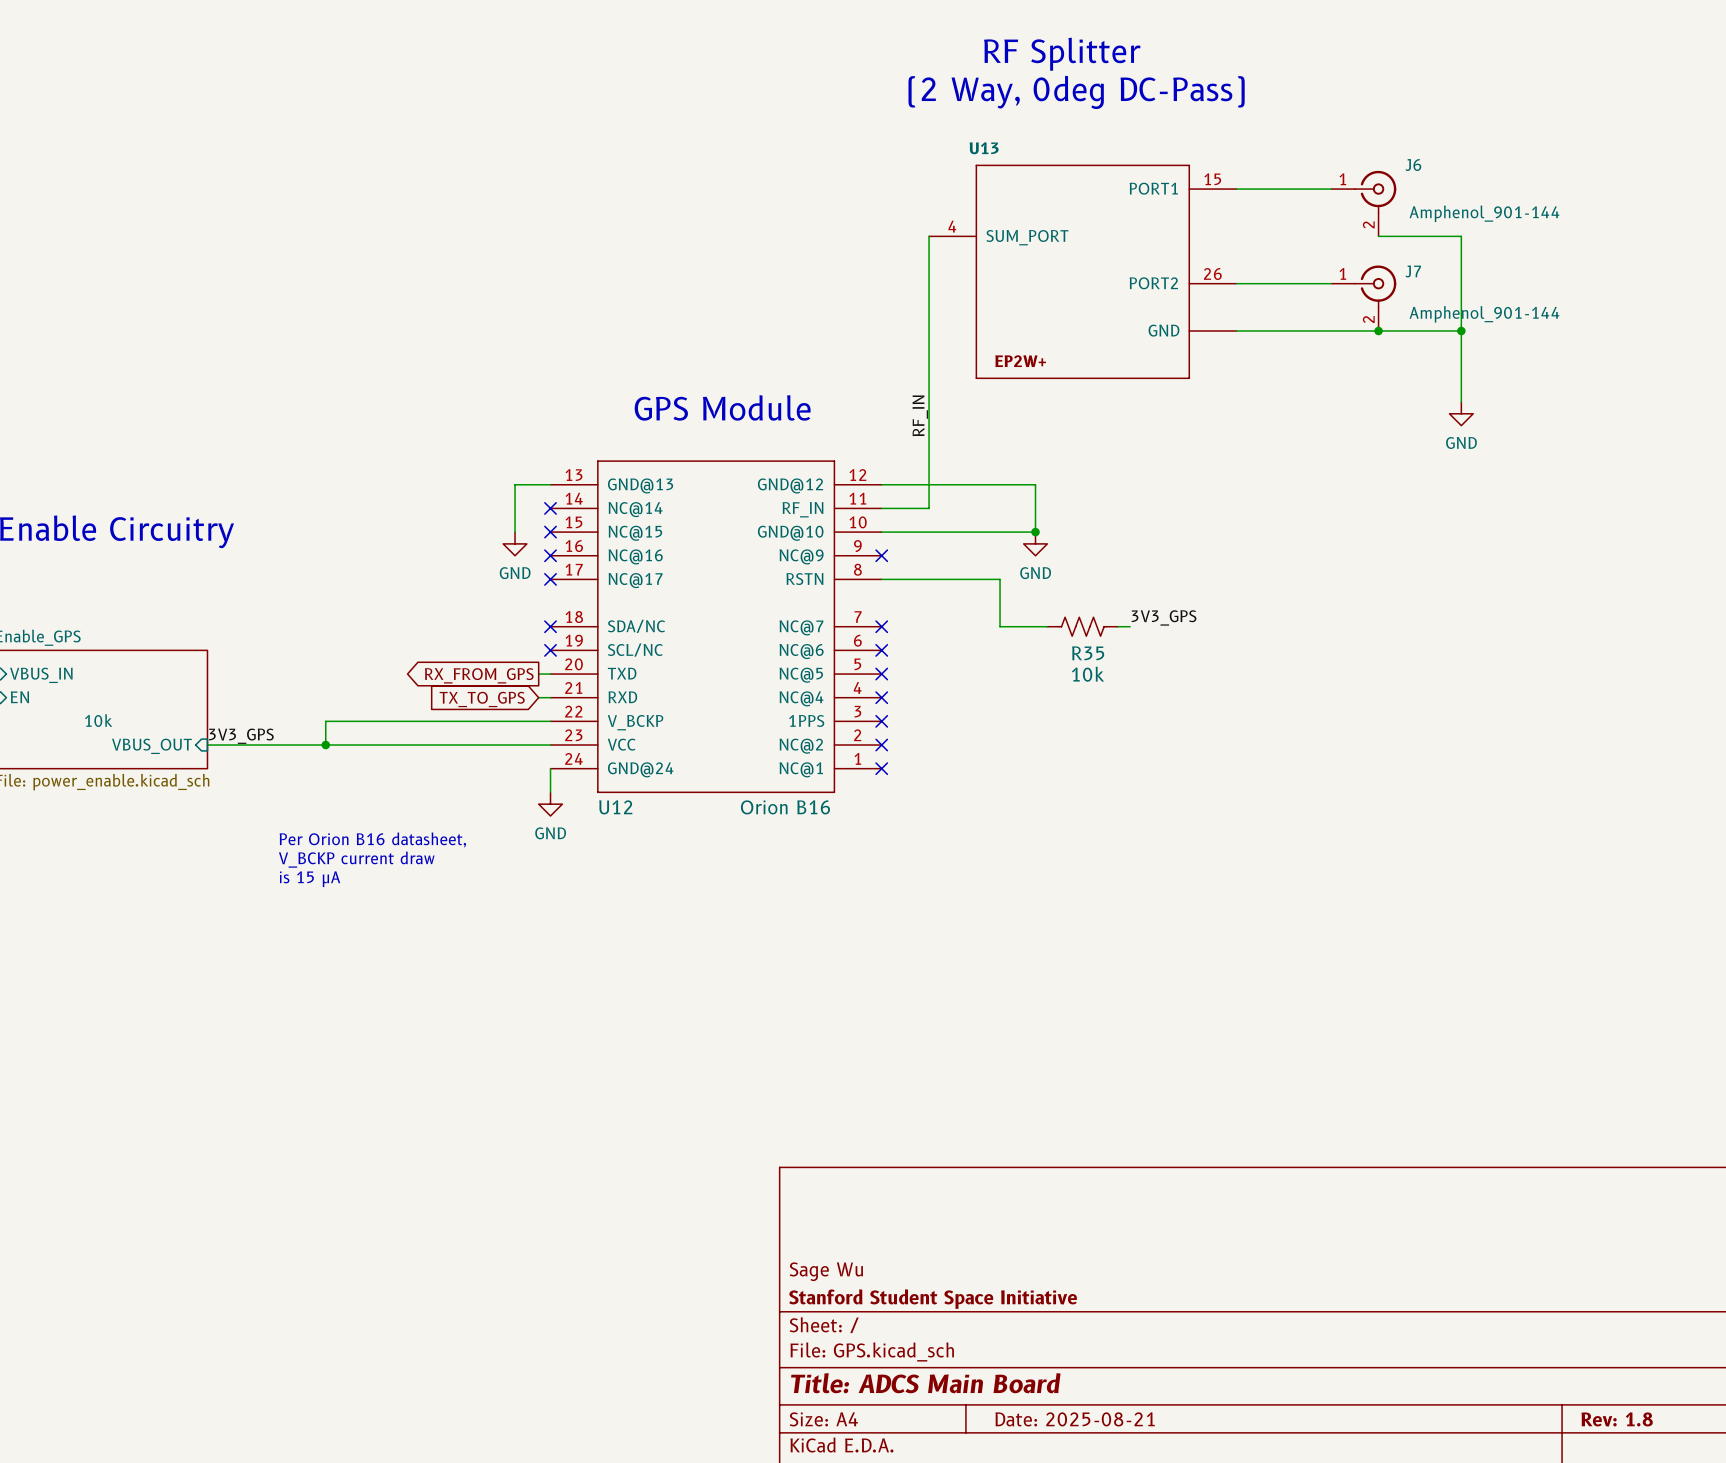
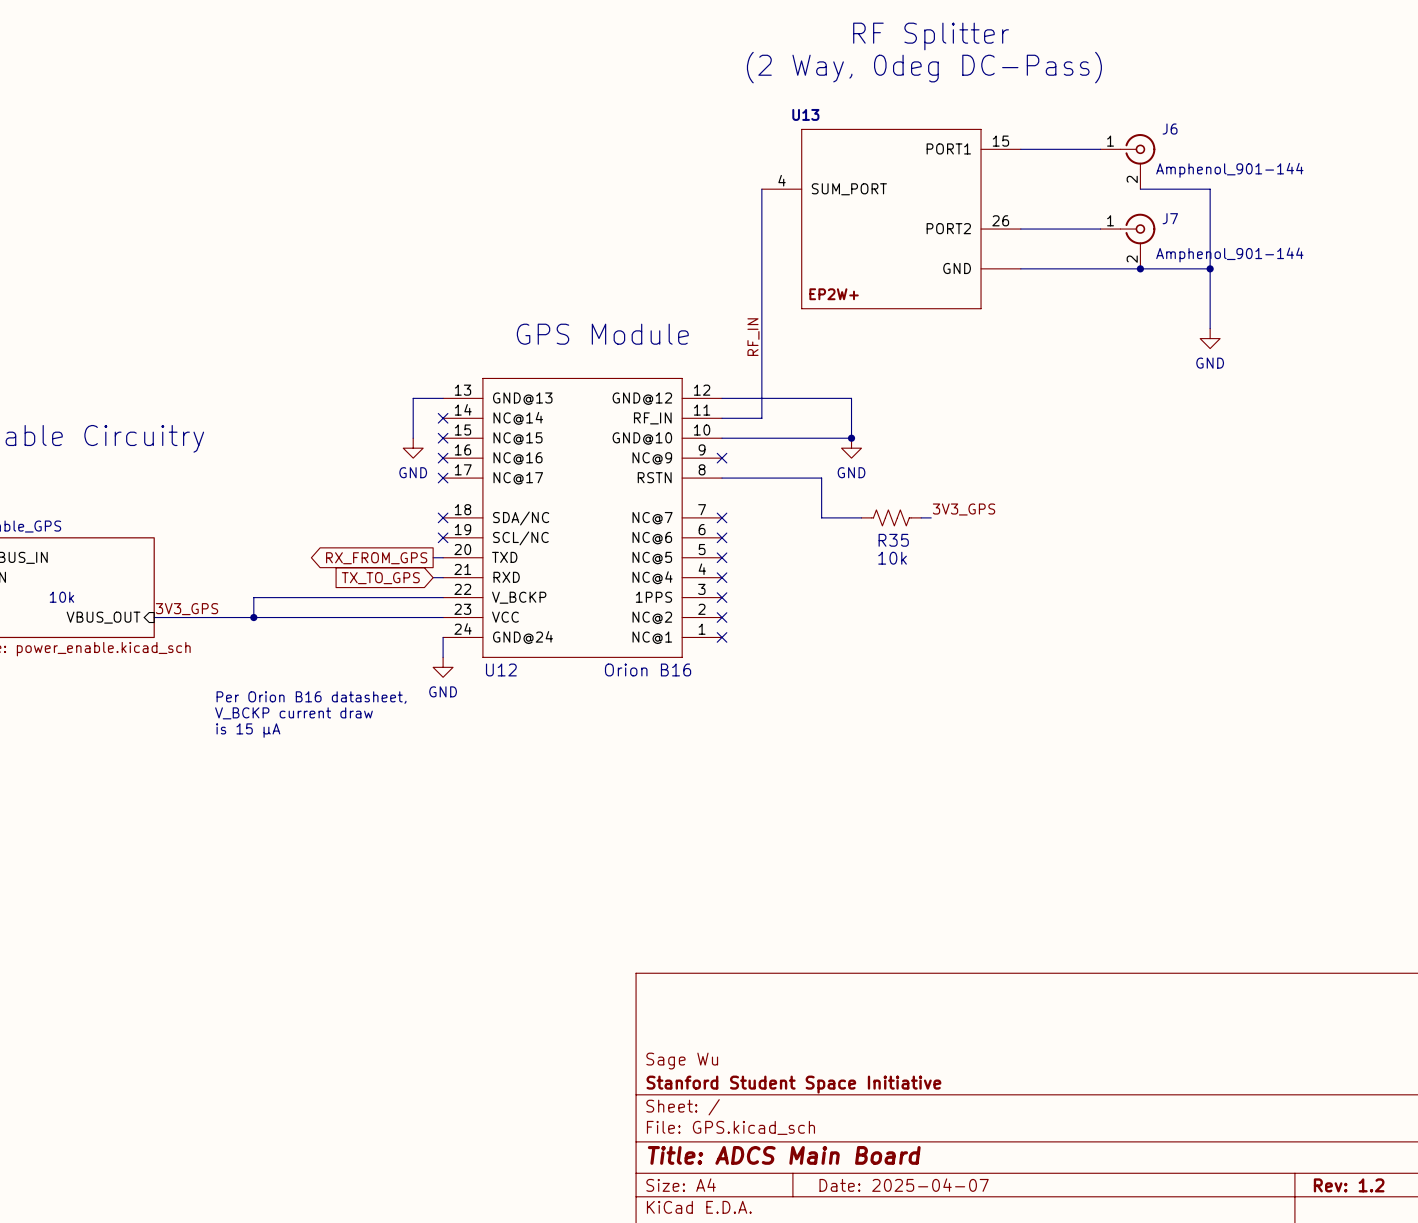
title block: Date: 2025-08-21 (1075, 1419) -> Date: 2025-04-07 (904, 1185)
title block: Rev: 1.8 (1617, 1419) -> Rev: 1.2 (1349, 1185)

